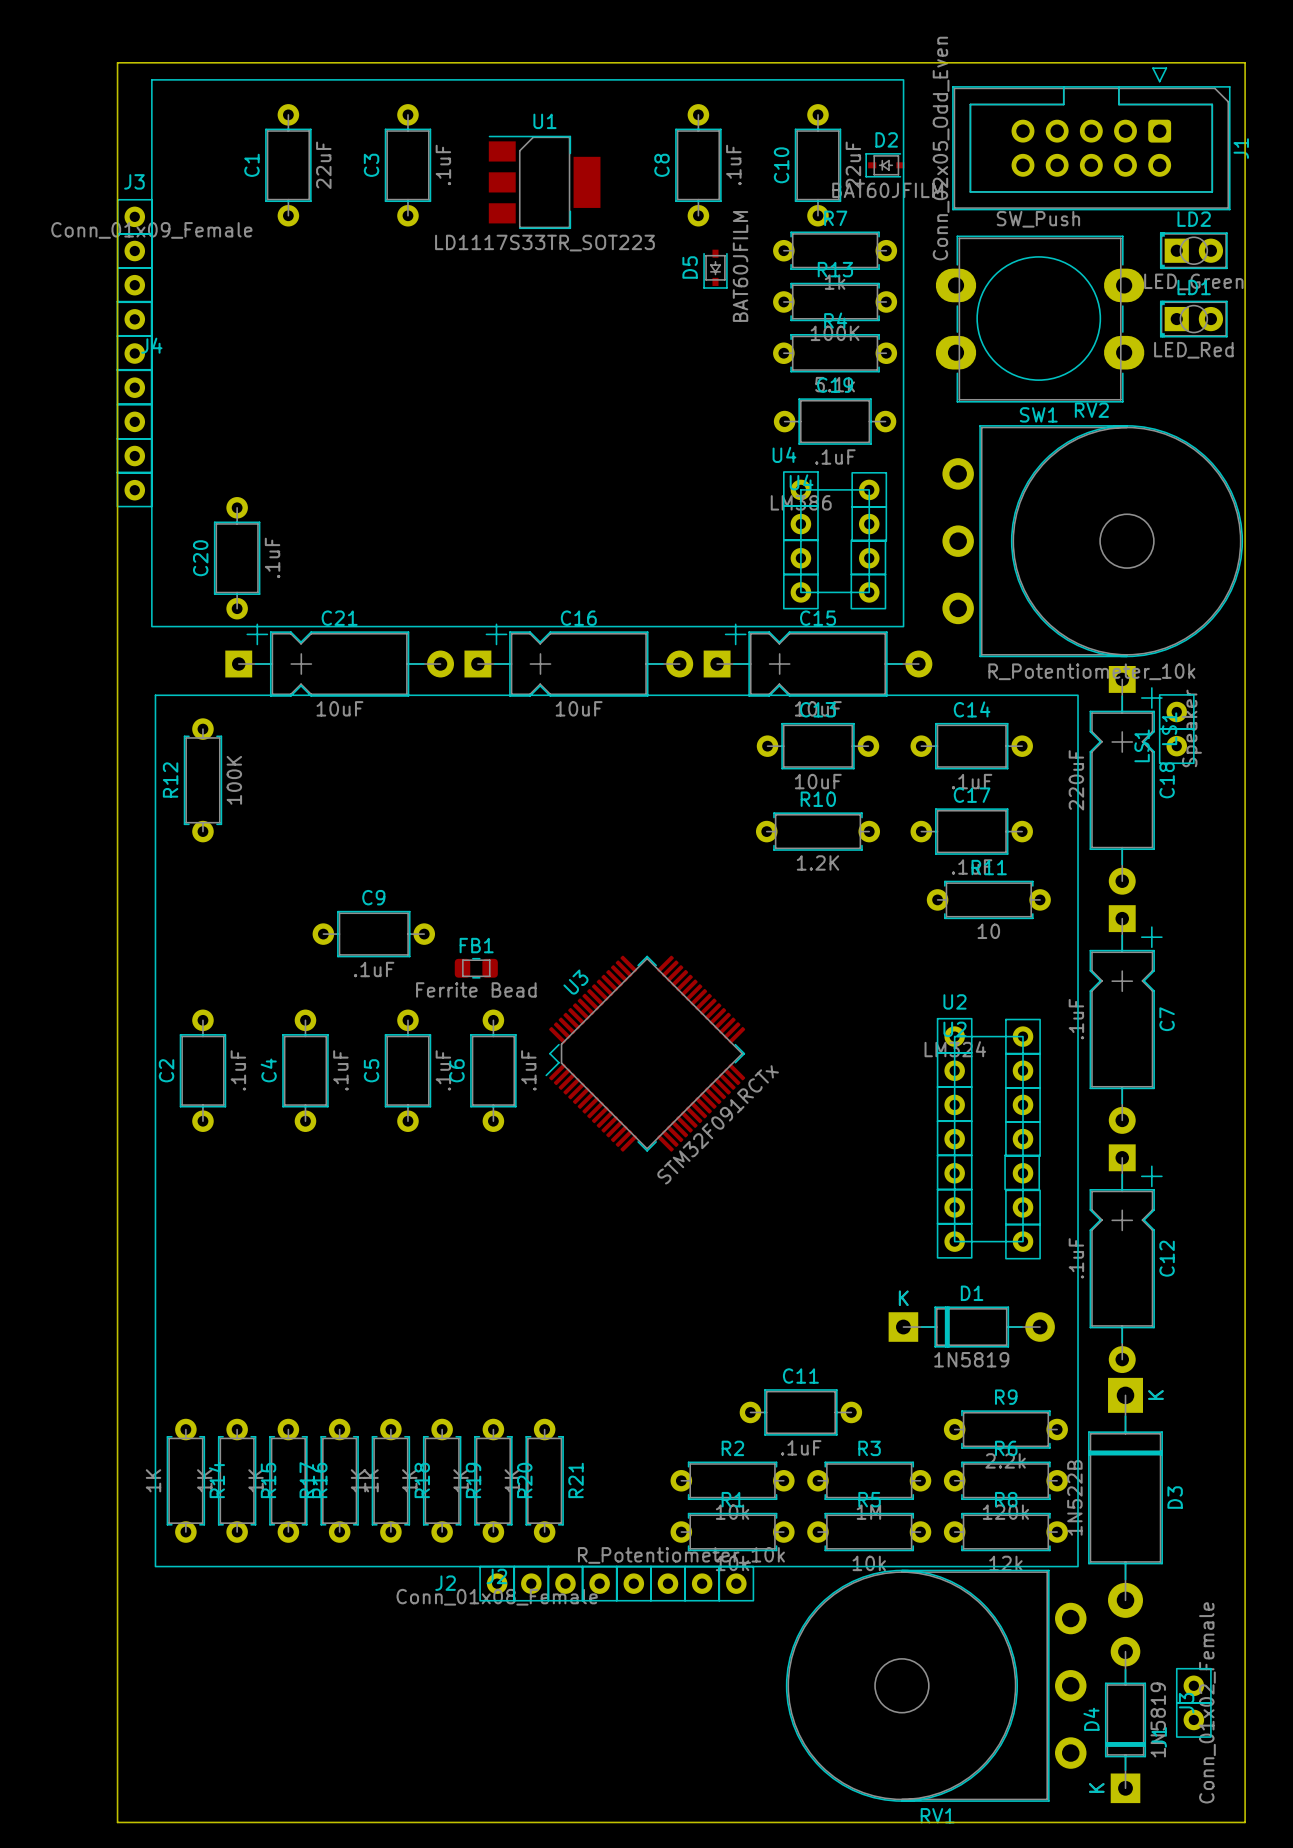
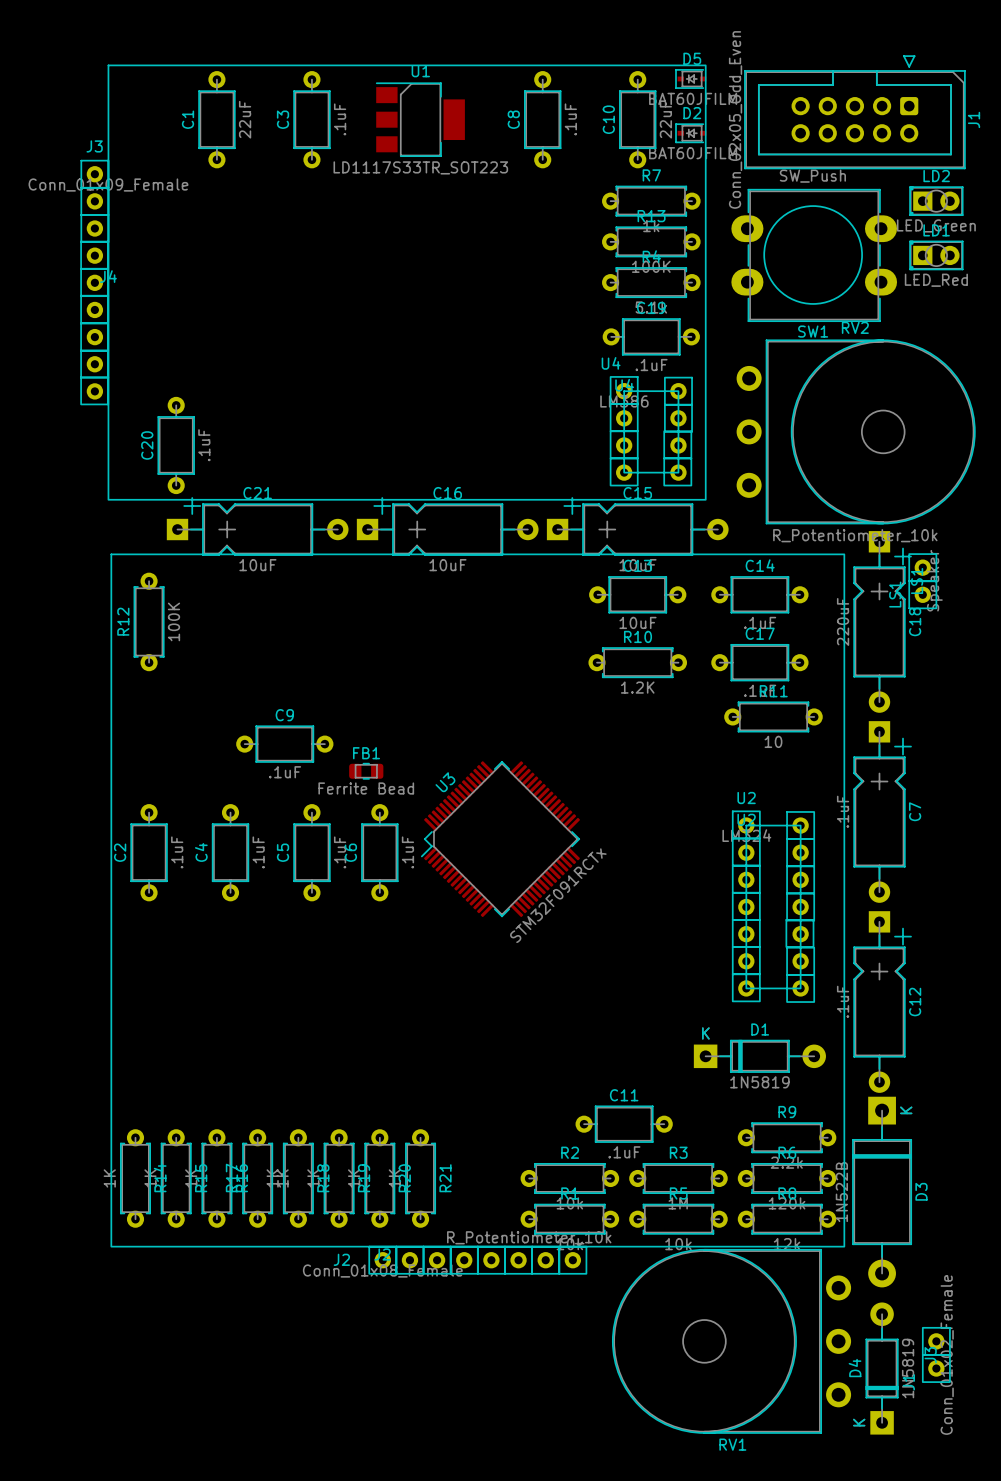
board edge: (117, 62) (1245, 62) (1245, 1822) (117, 1822) (117, 62) -> none
C1 position: (288, 165) -> (216, 119)
C3 position: (407, 165) -> (311, 119)
C8 position: (698, 165) -> (542, 119)
C10 position: (817, 165) -> (637, 119)
U1 position: (544, 182) -> (420, 119)
D5 rotation: 0° (715, 269) -> 90° clockwise (690, 78)
D5 position: (715, 269) -> (690, 78)

